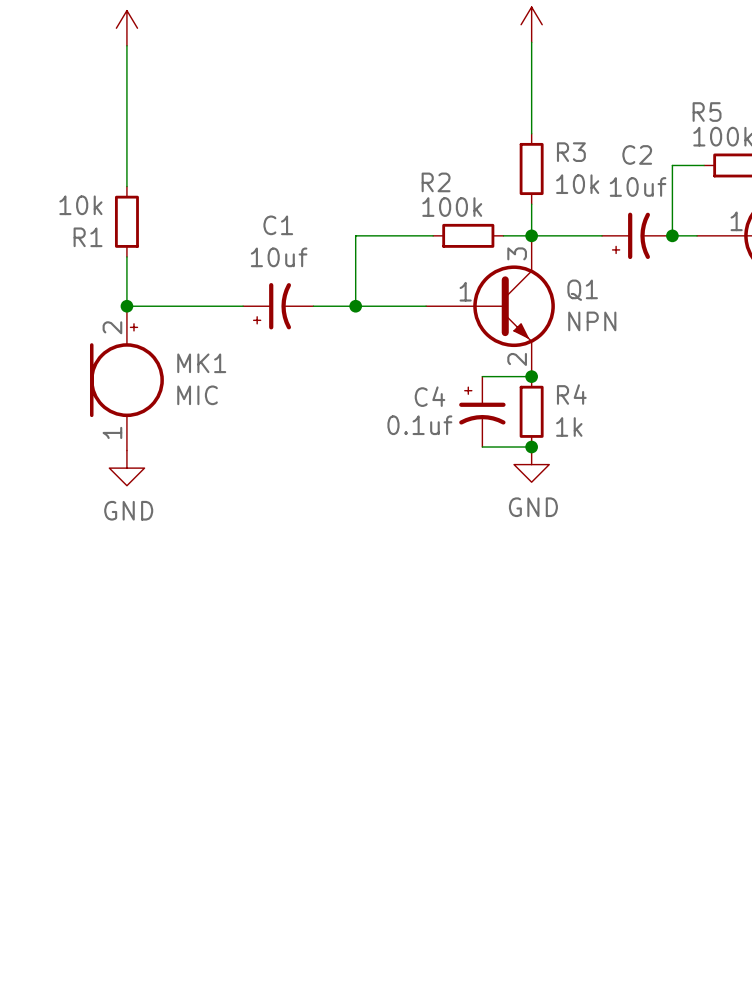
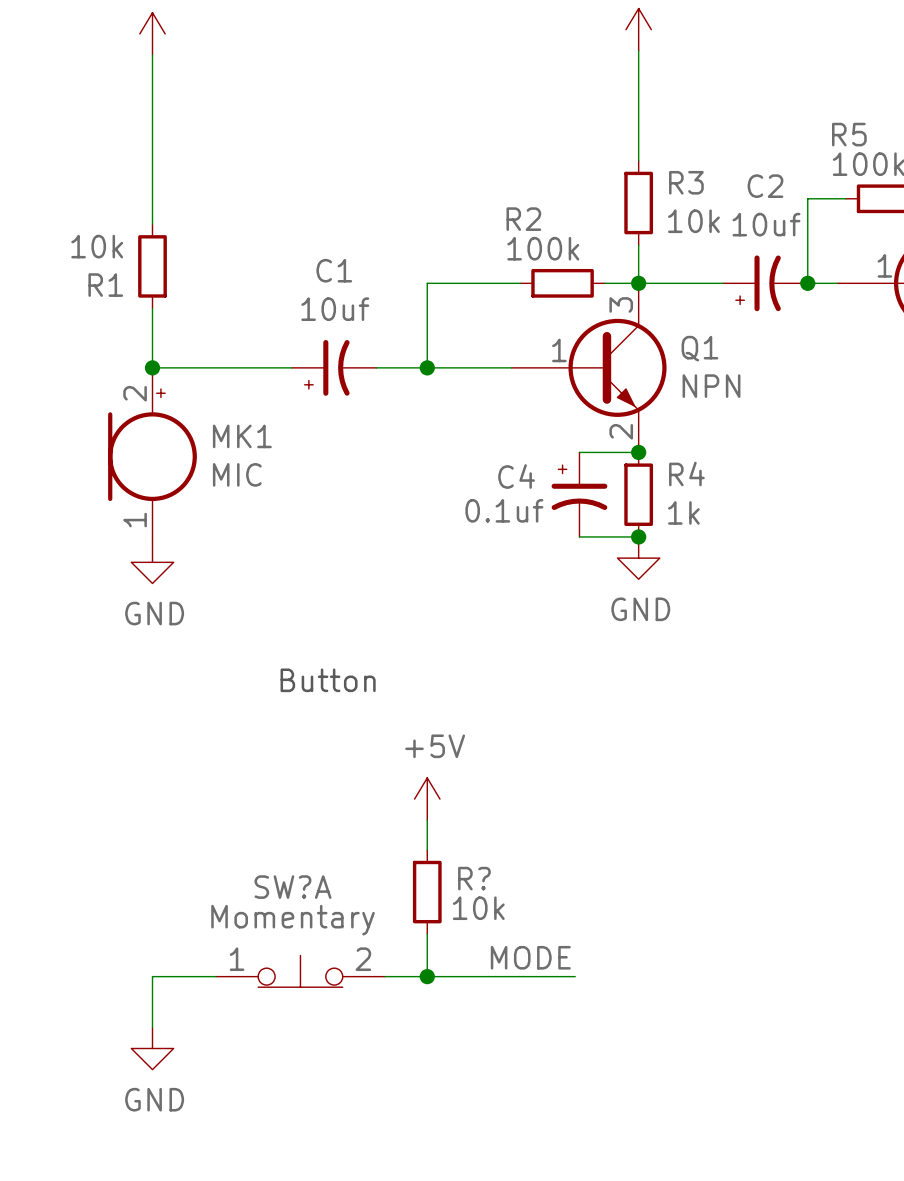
text: none -> Button (328, 680)
power symbol: none -> +5V (427, 799)
wire: none -> (427, 820) (427, 849)
R?: none -> 10k (427, 892)
wire: none -> (427, 934) (427, 976)
label: none -> MODE (530, 957)
SW?A: none -> Momentary (300, 971)
wire: none -> (215, 976) (152, 976) (152, 1027)
wire: none -> (385, 976) (575, 976)
junction: none -> (427, 976)
power symbol: none -> GND (152, 1048)

